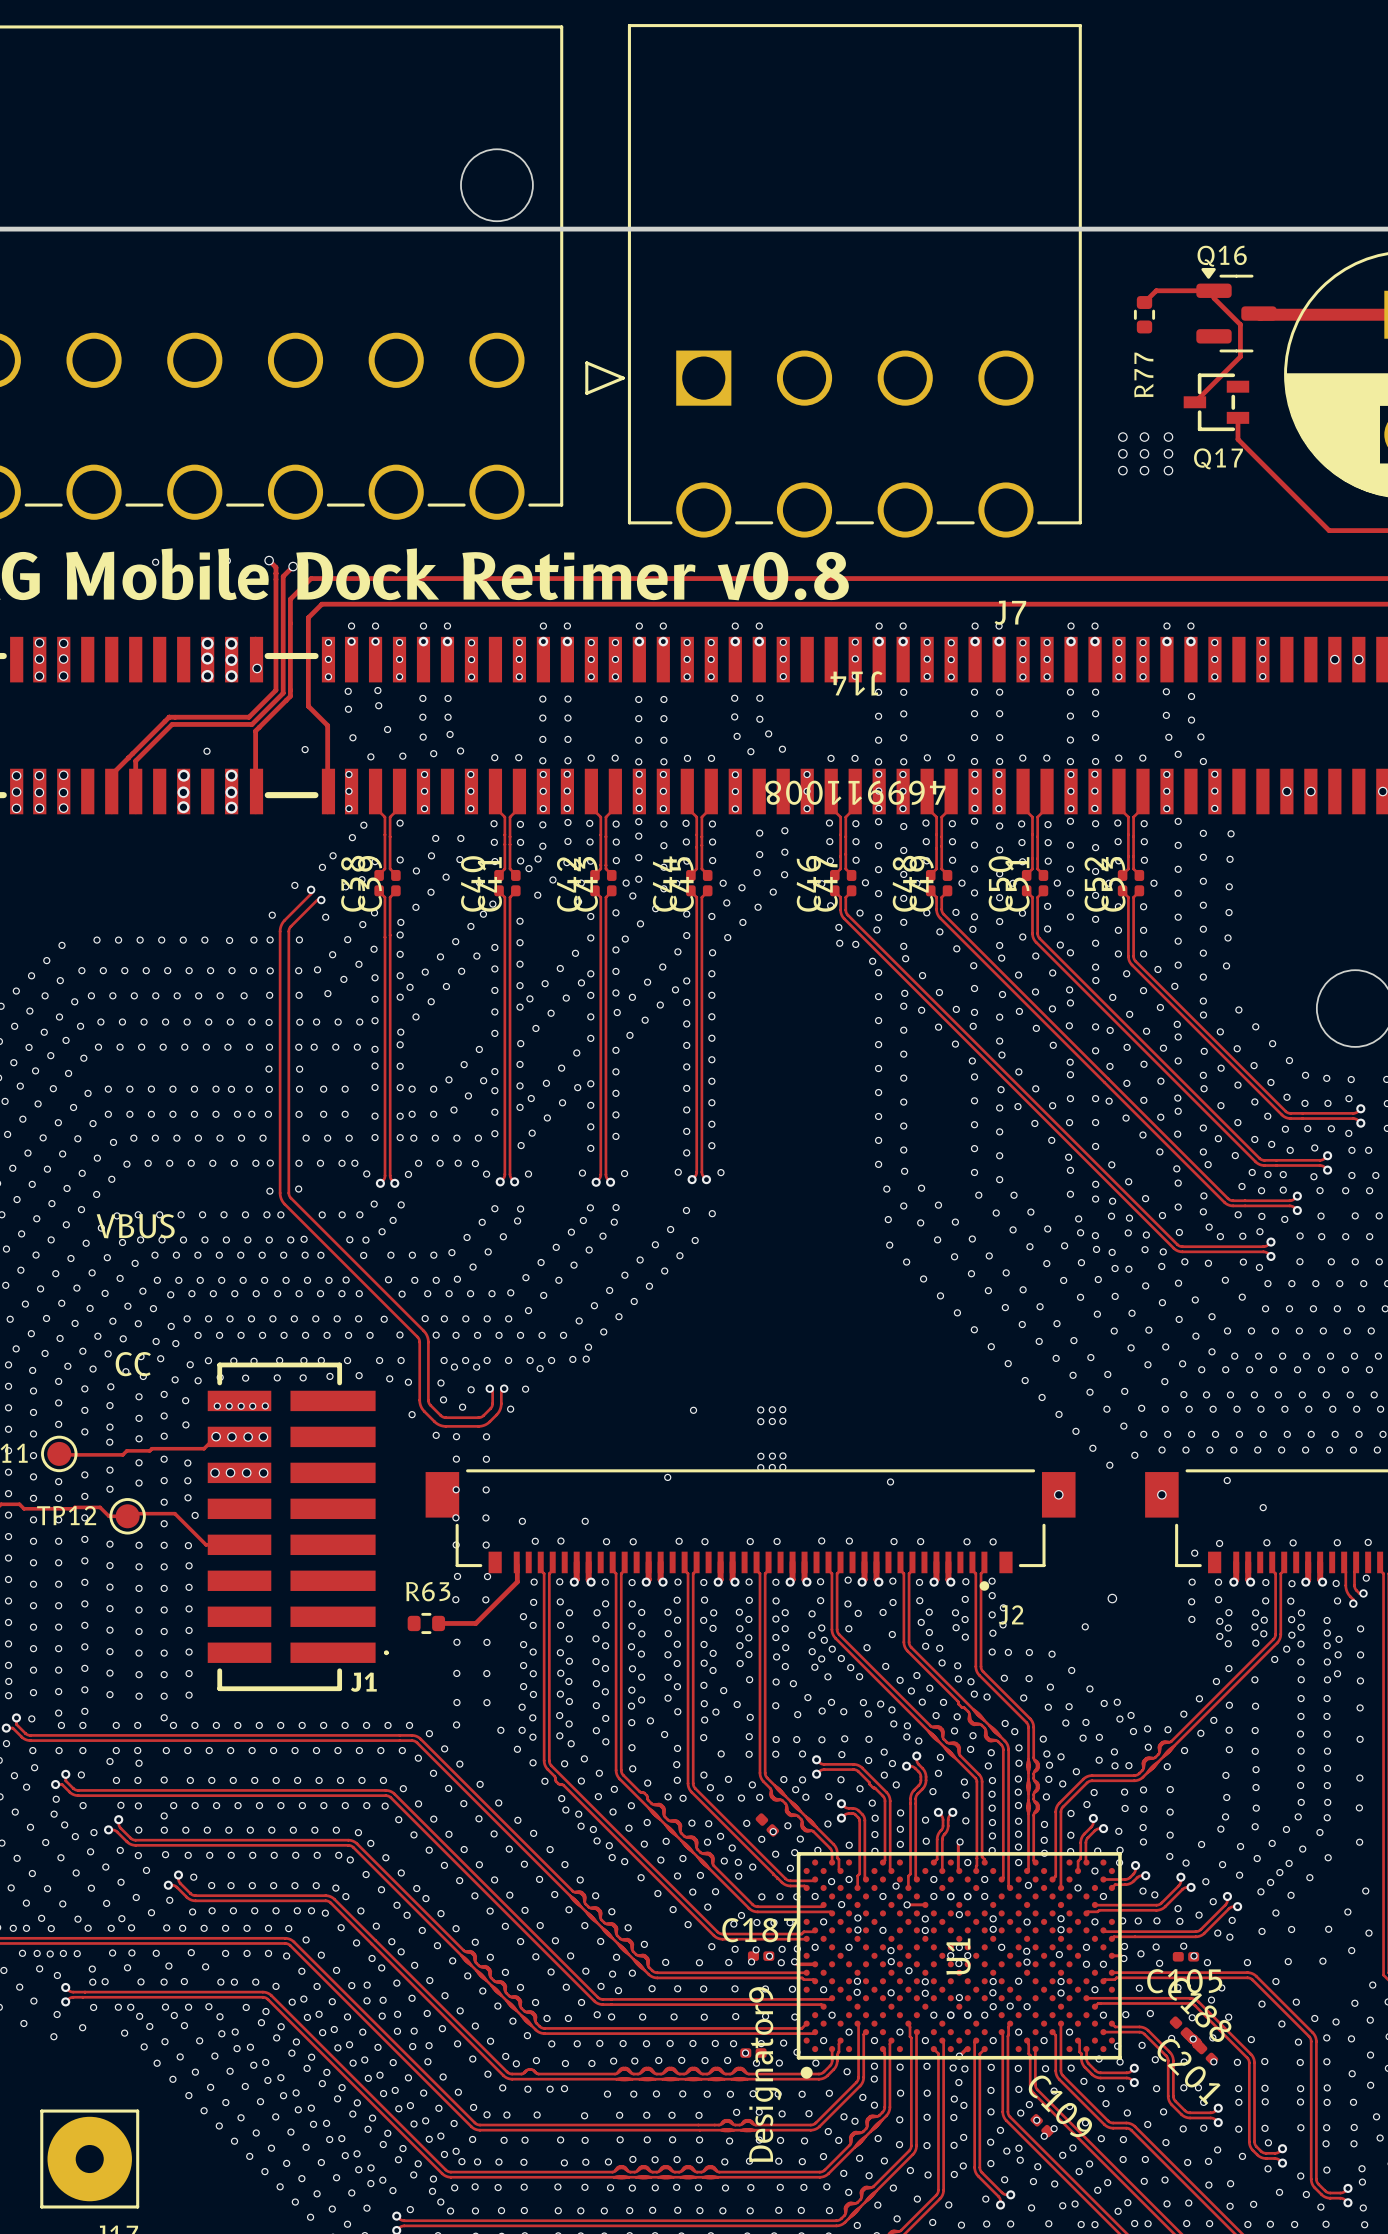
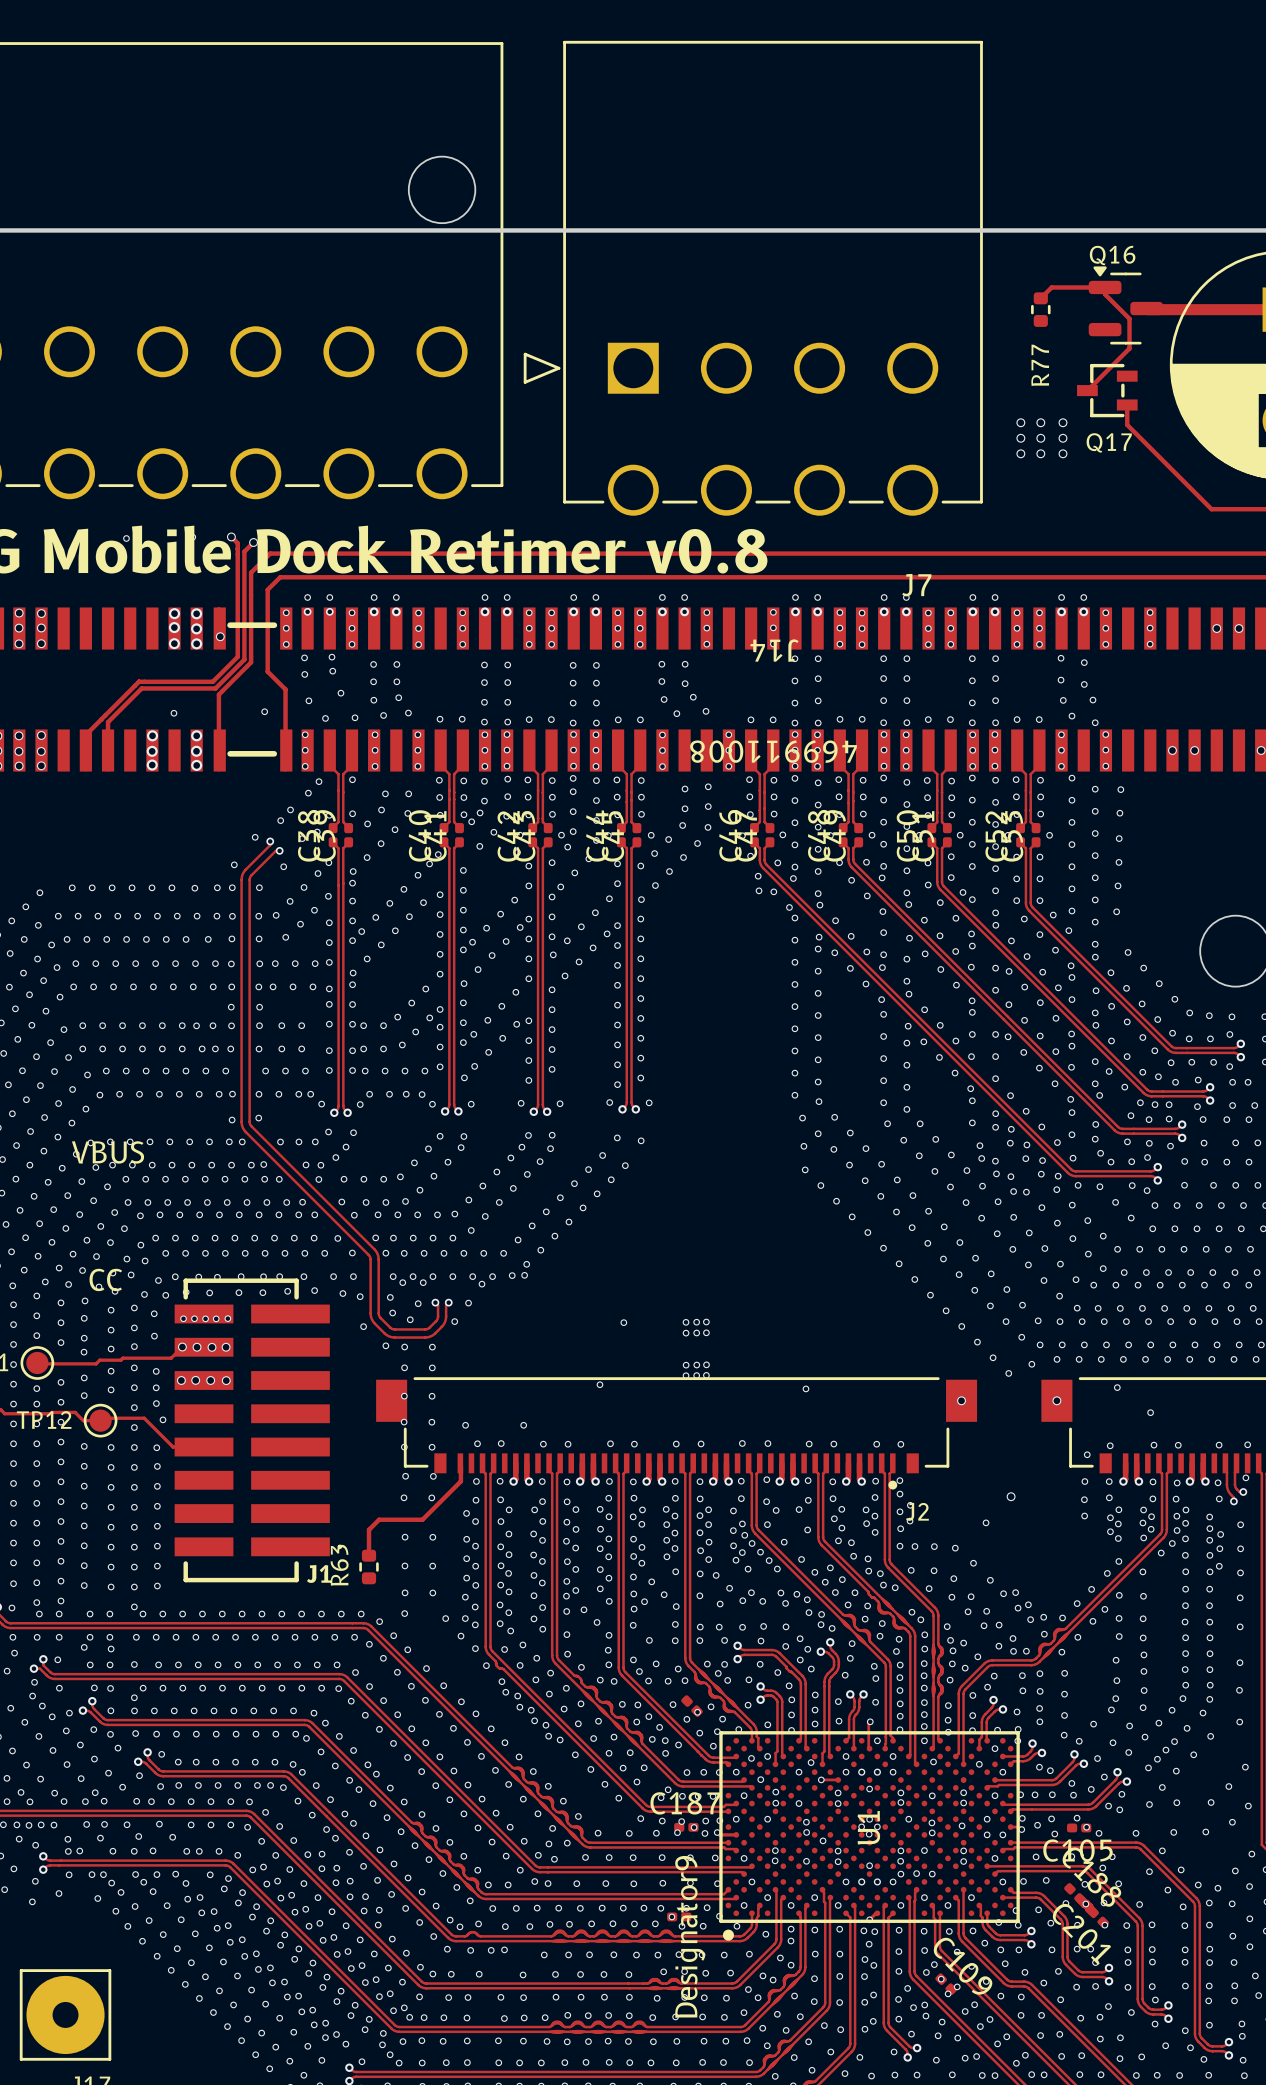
R63 rotation: 0° (426, 1623) -> 90° clockwise (369, 1567)
R63 position: (426, 1623) -> (369, 1567)
track: none -> (388, 1519) (379, 1519) (369, 1529) (369, 1555)

